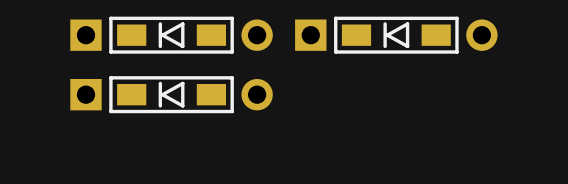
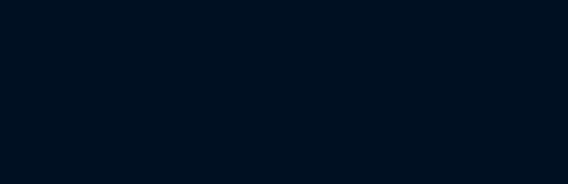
part: (171, 35) -> none
part: (396, 35) -> none
part: (171, 94) -> none

